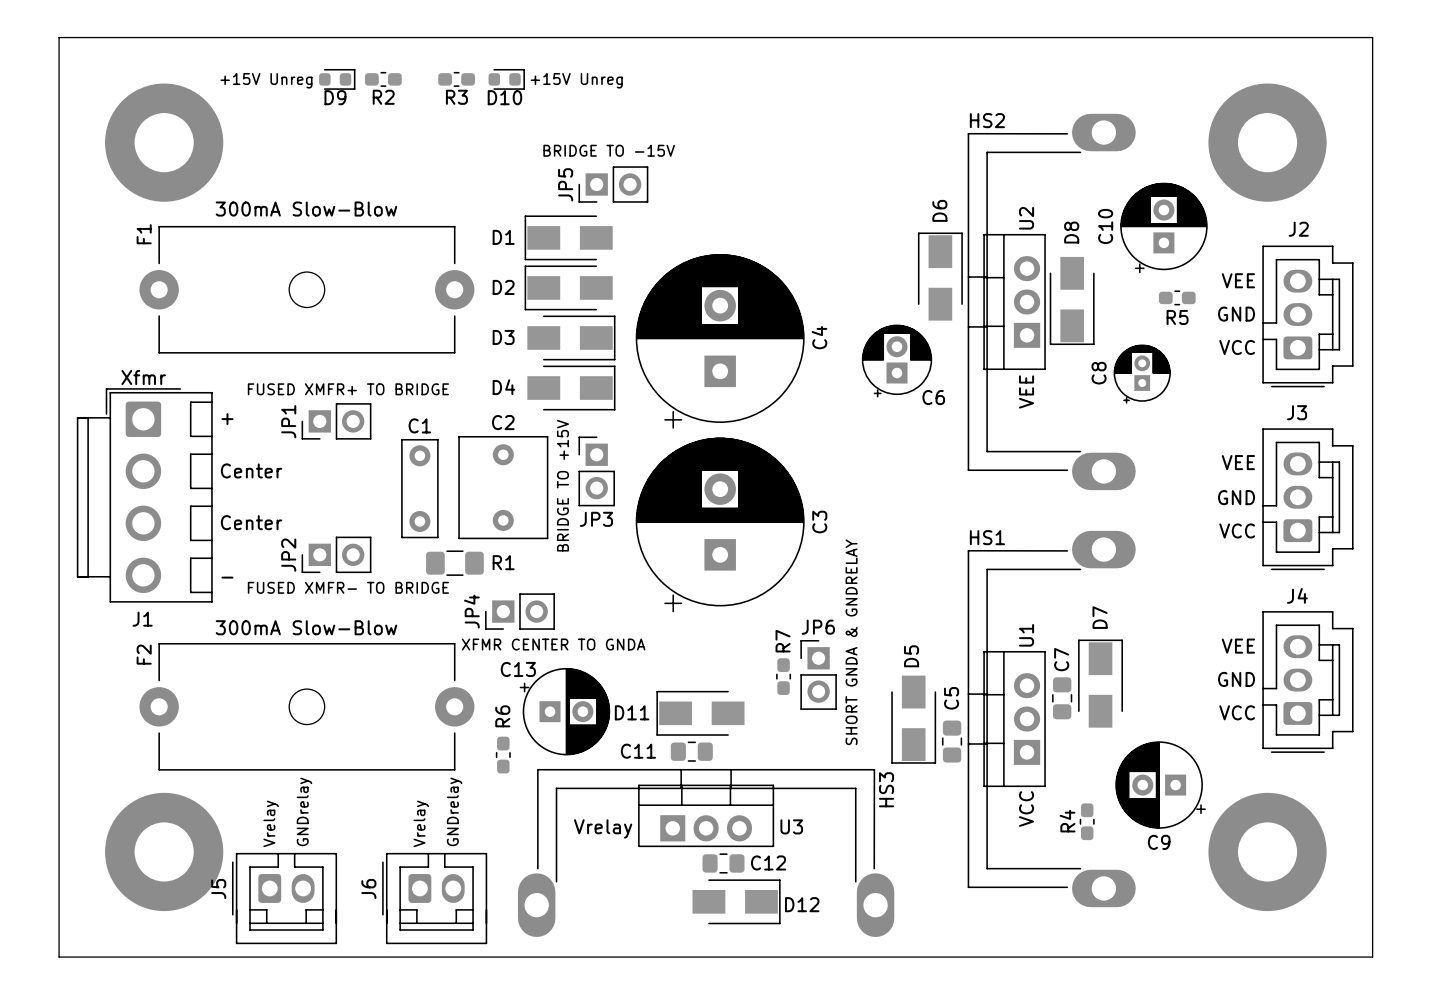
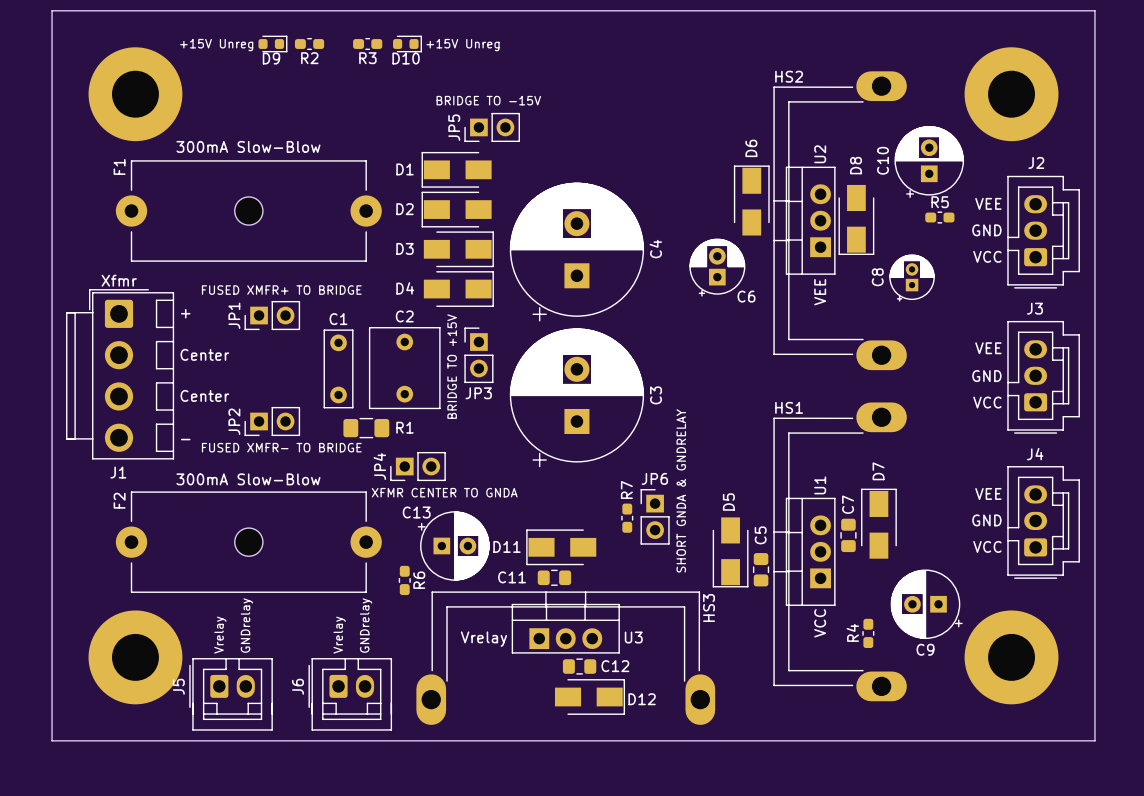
R5 name position: R5 (1177, 317) -> R5 (940, 202)
R6 name position: R6 (502, 716) -> R6 (419, 580)

